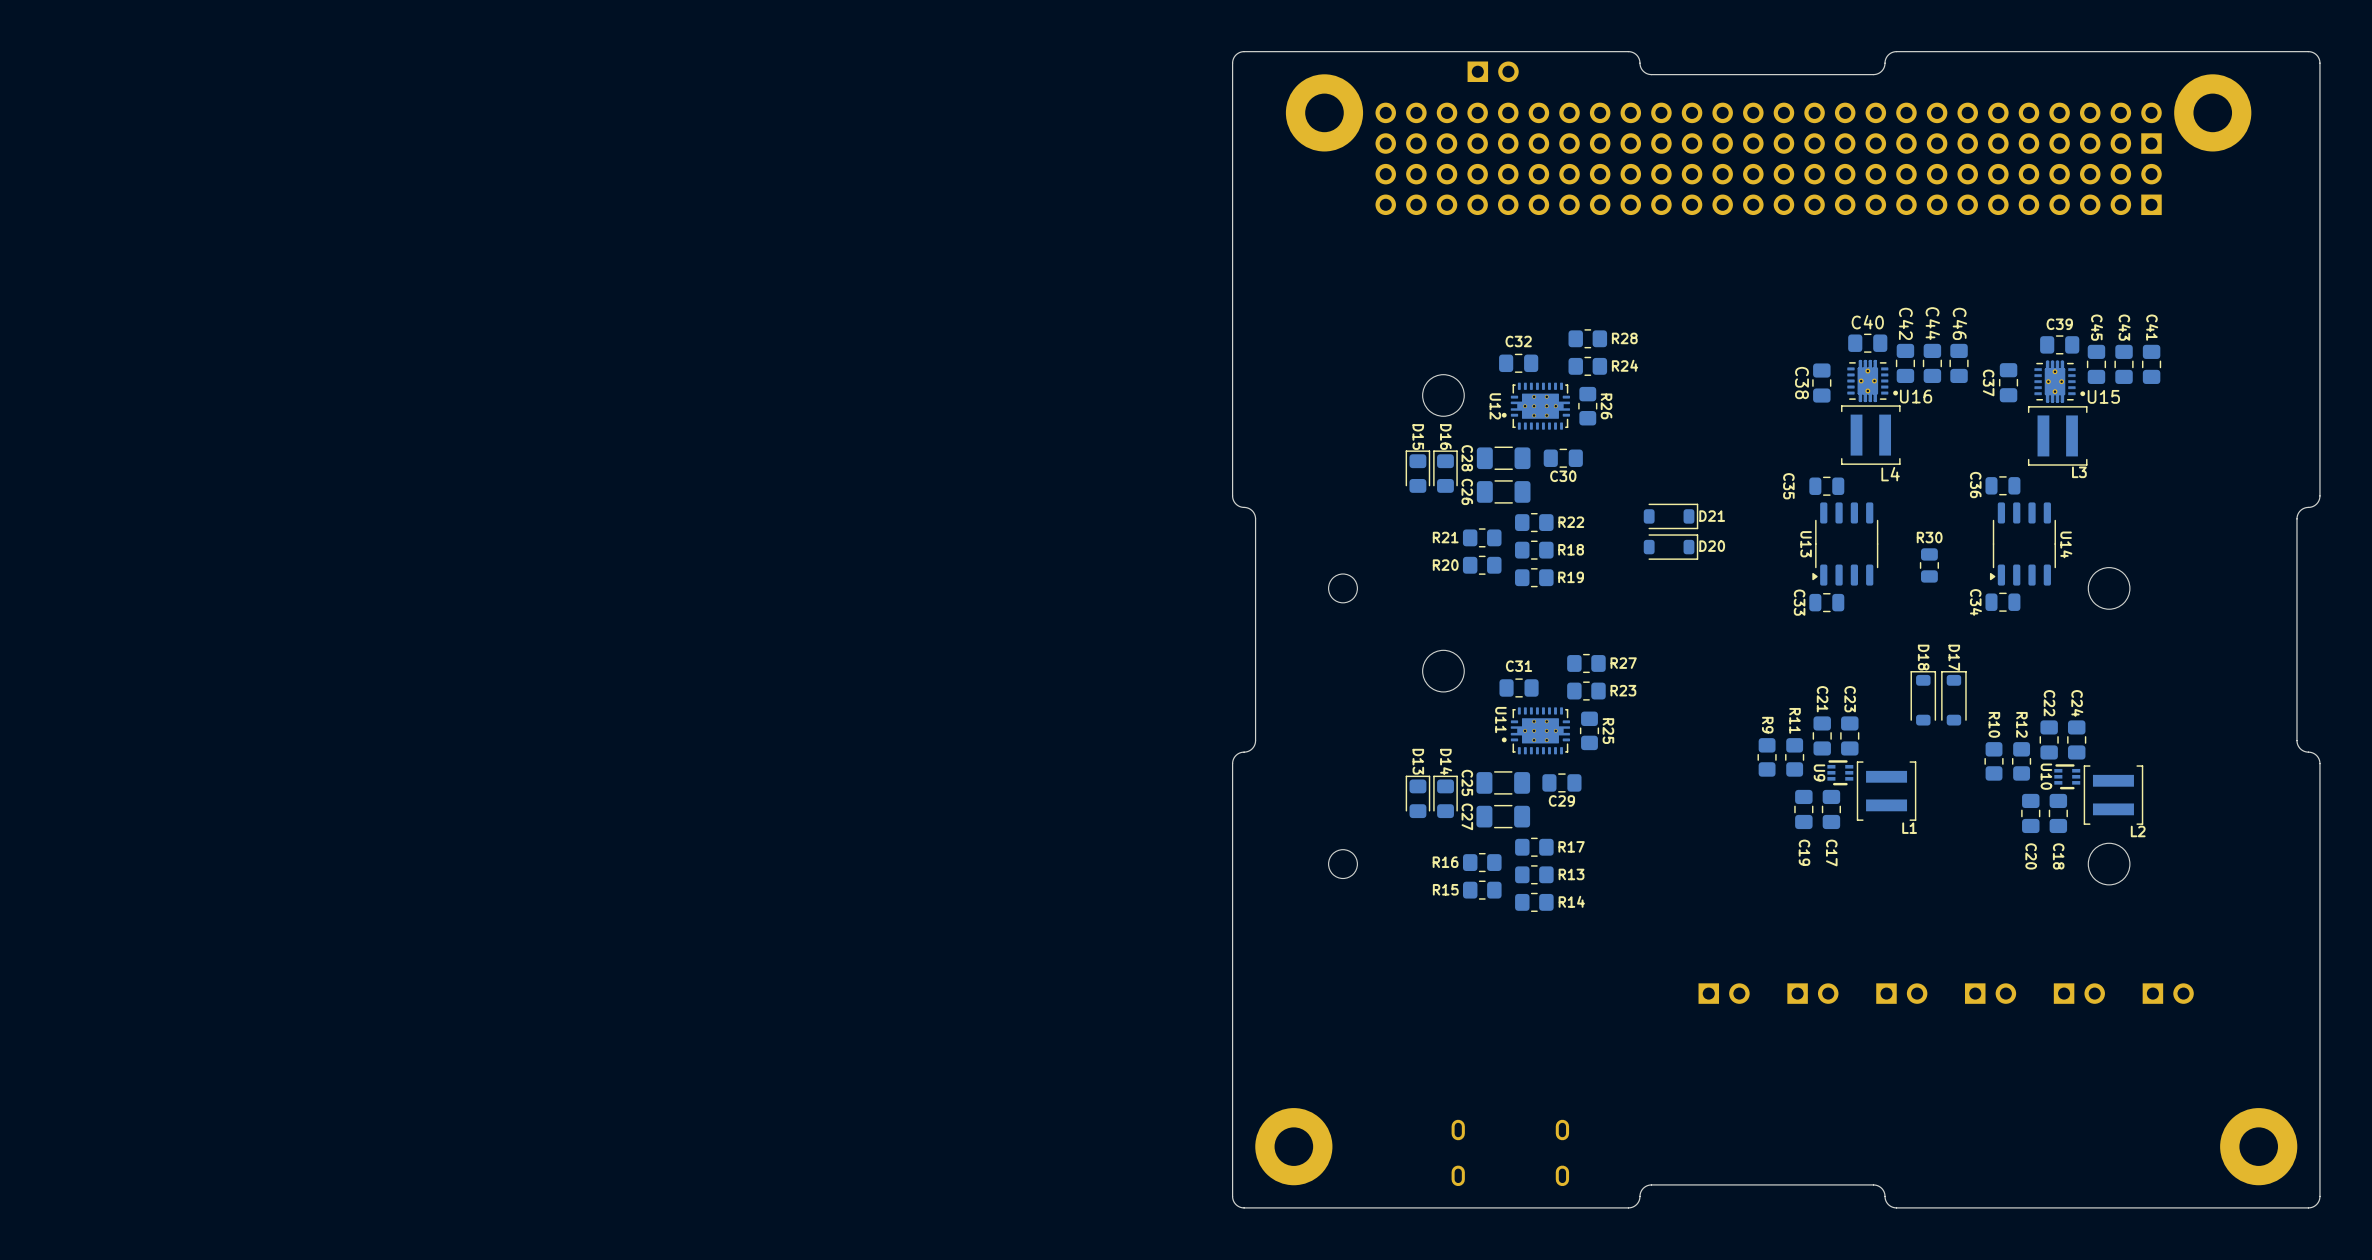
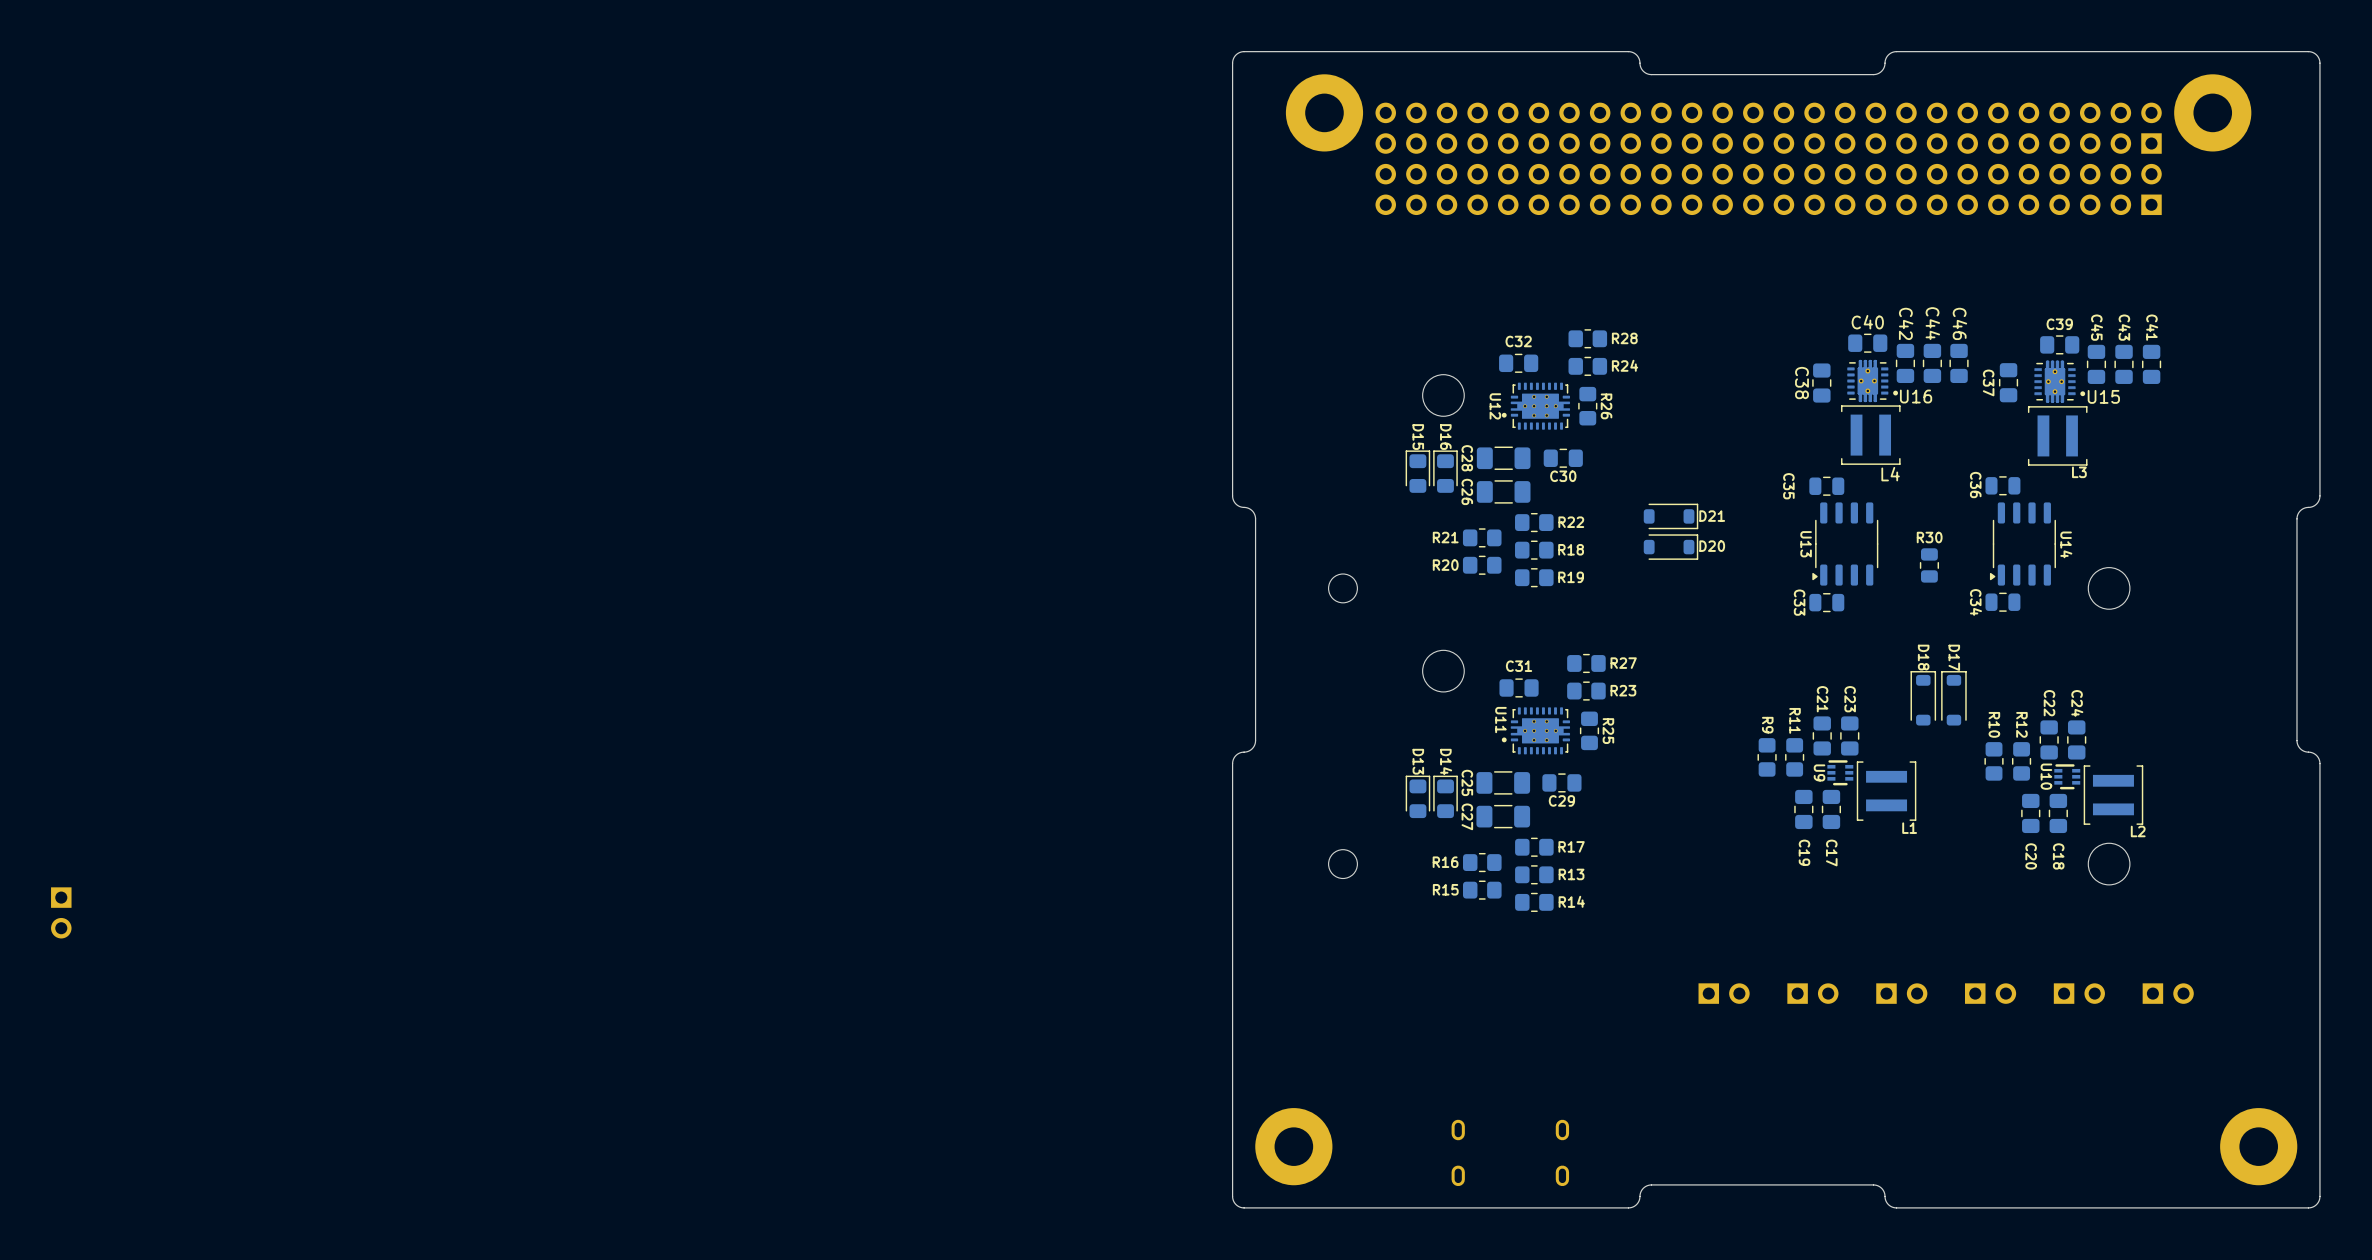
part: (1493, 71) -> none
part: none -> (61, 912)

